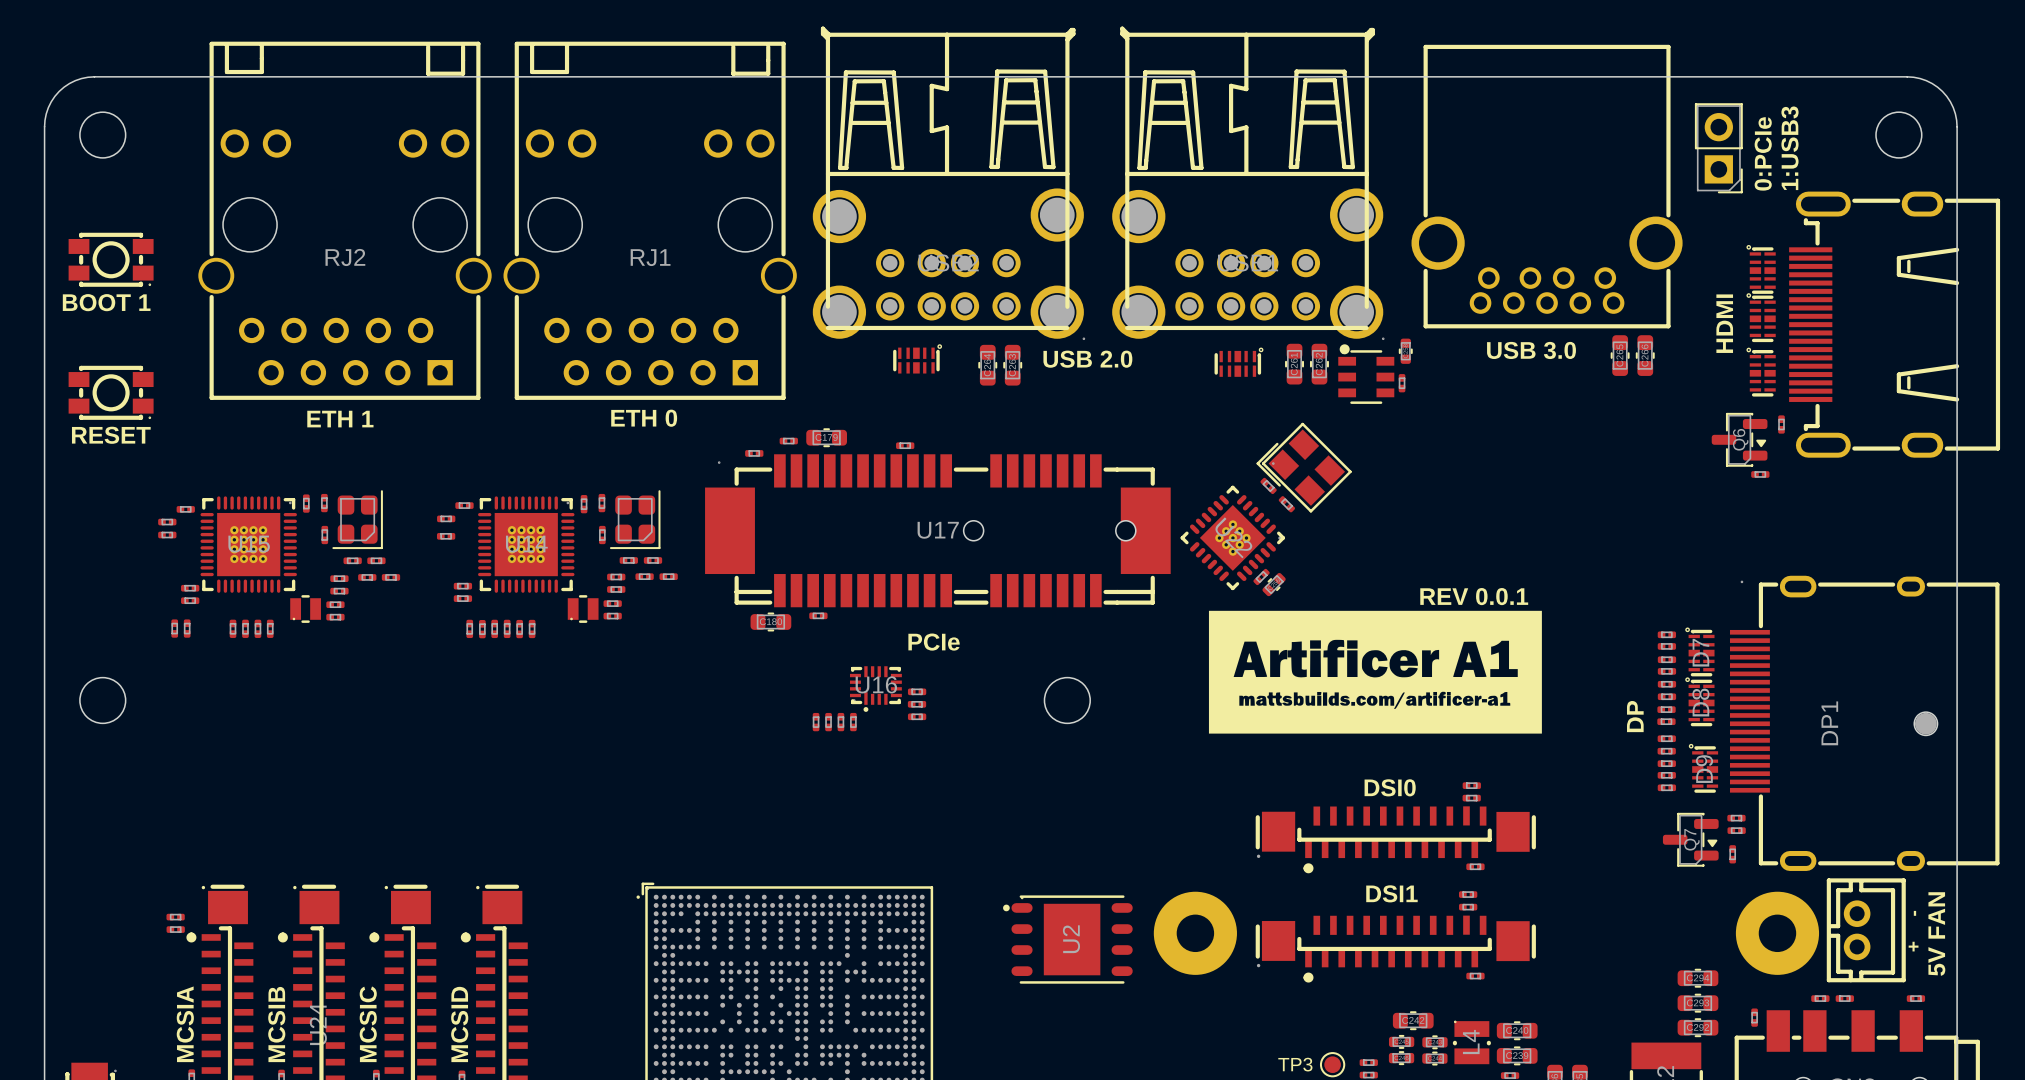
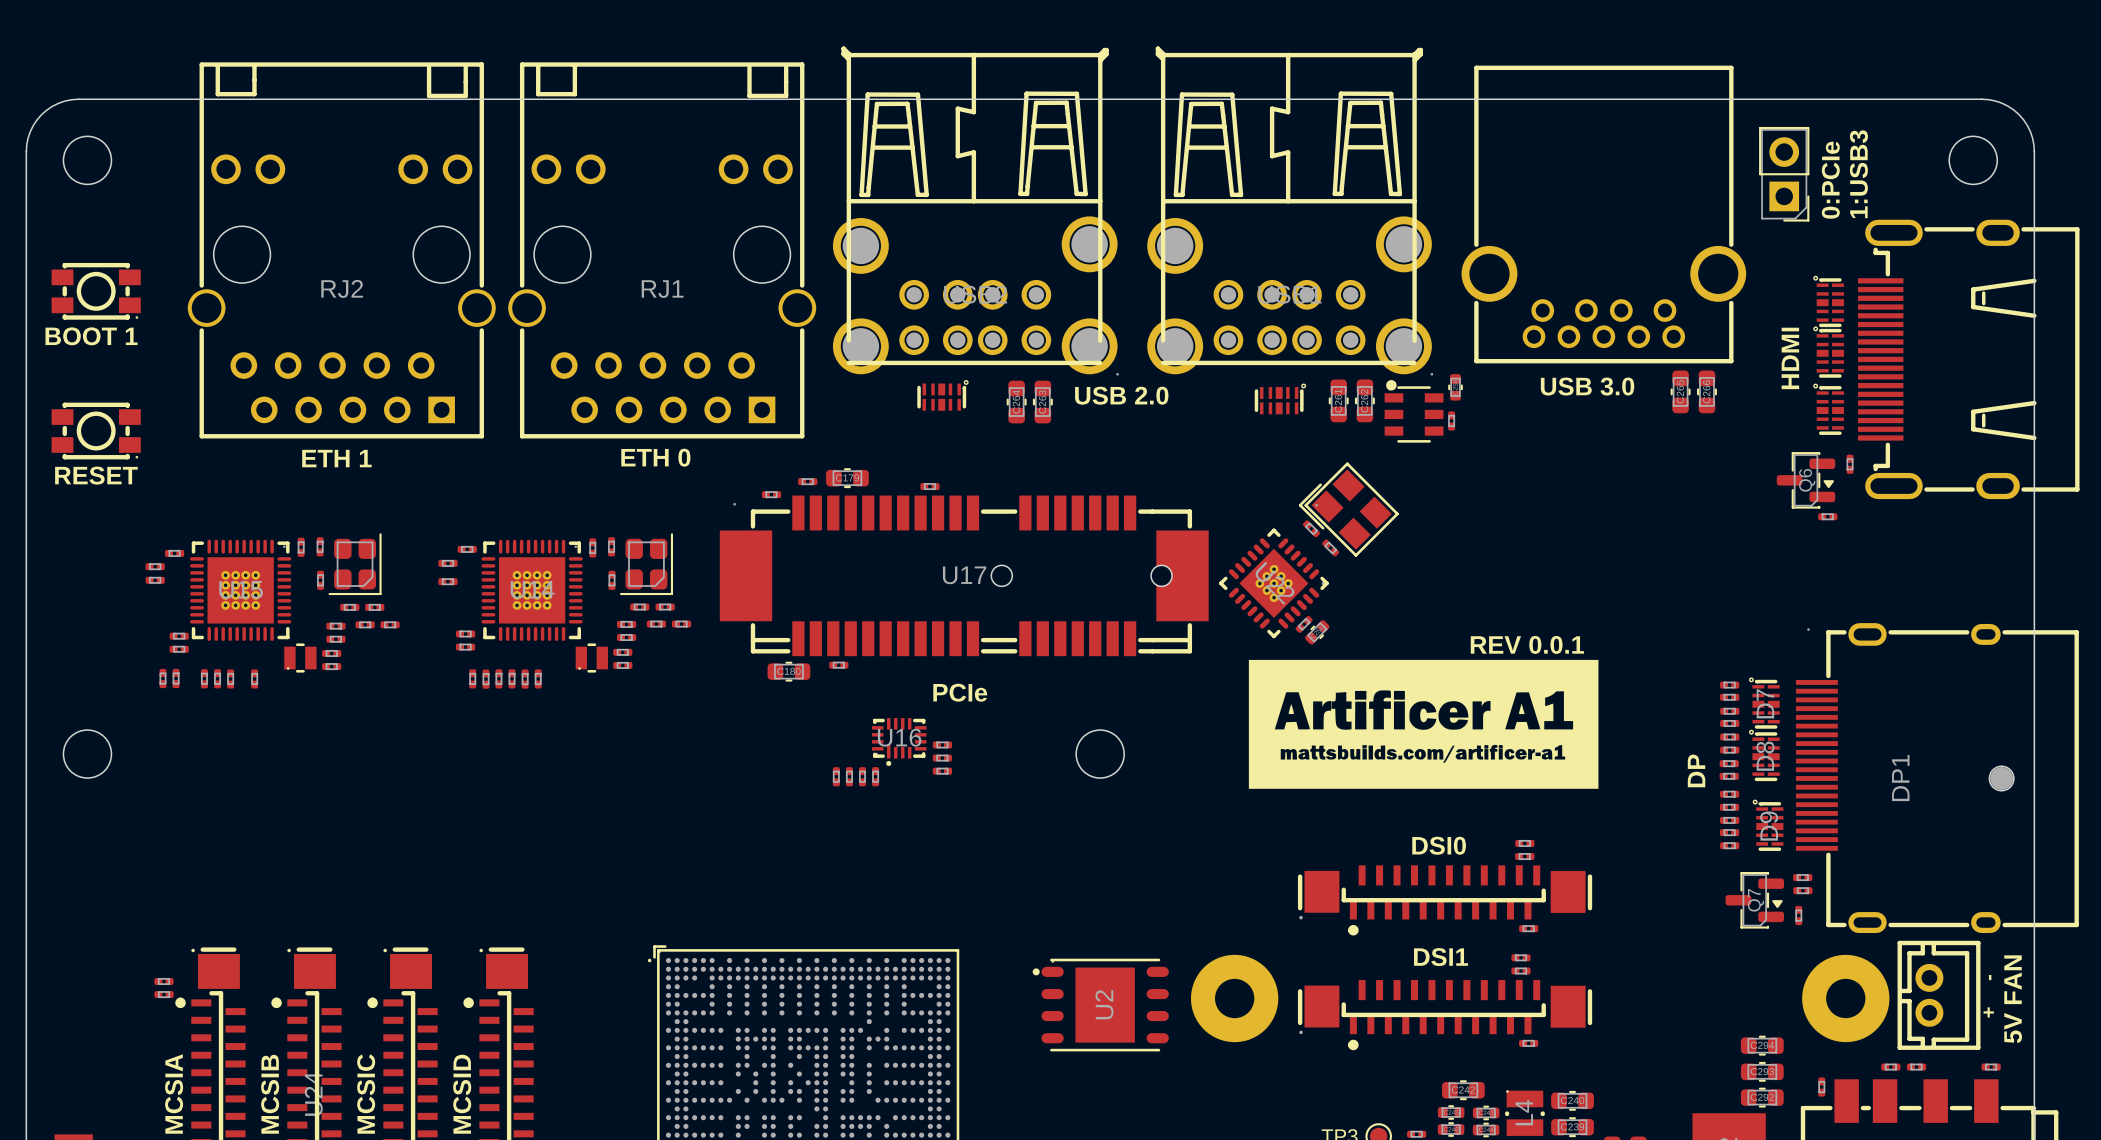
part: none -> (204, 678)
part: none -> (217, 678)
part: (232, 628) -> none
part: none -> (230, 678)
part: (245, 628) -> none
part: (257, 628) -> none
part: none -> (254, 678)
part: (270, 628) -> none

